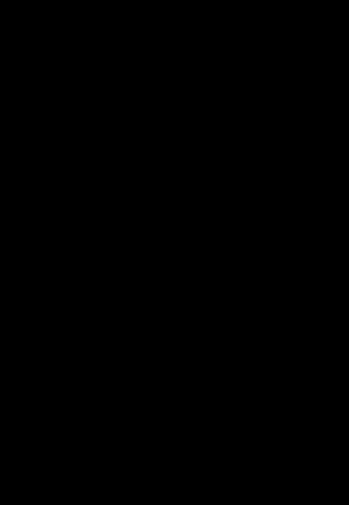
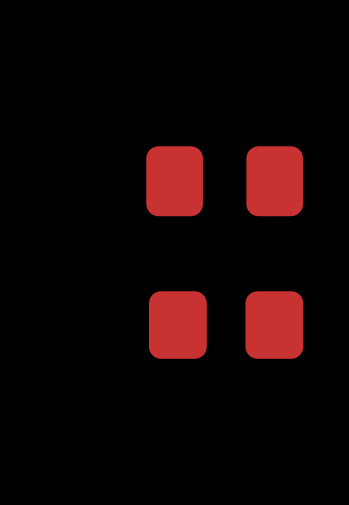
part: none -> (224, 181)
part: none -> (226, 325)

